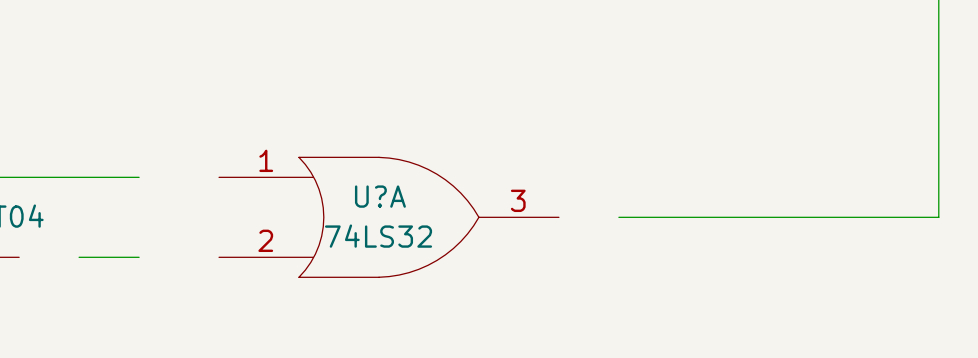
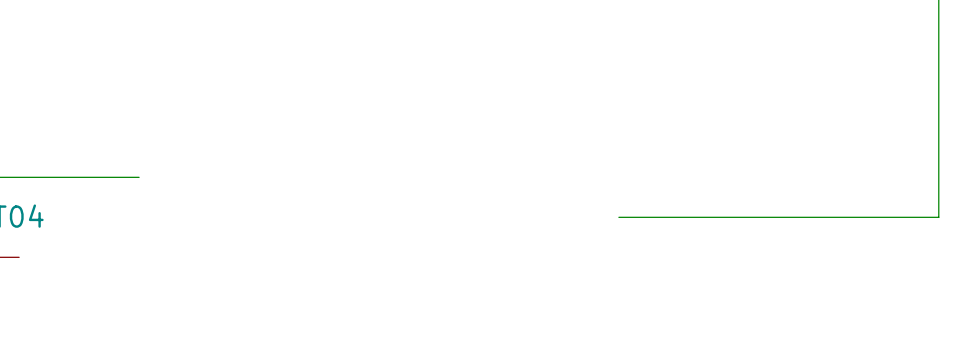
U?A: 74LS32 (388, 217) -> none
wire: (79, 257) (139, 257) -> none

